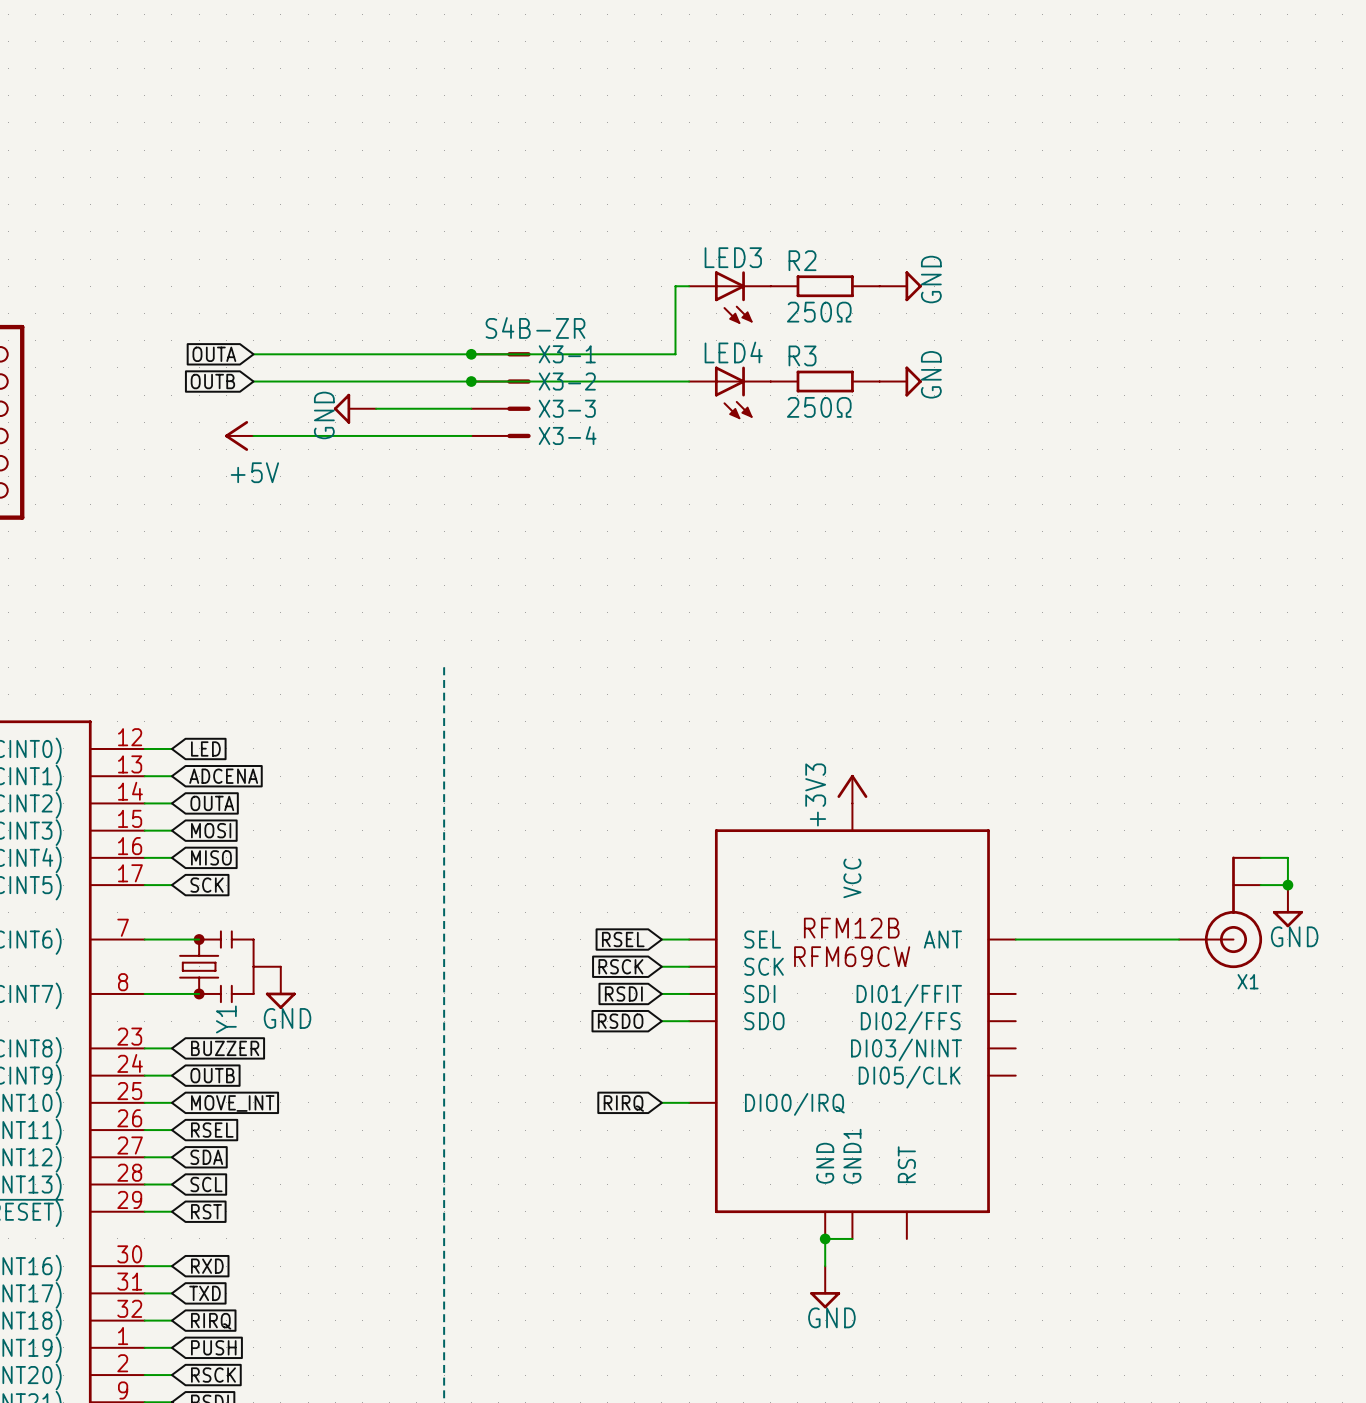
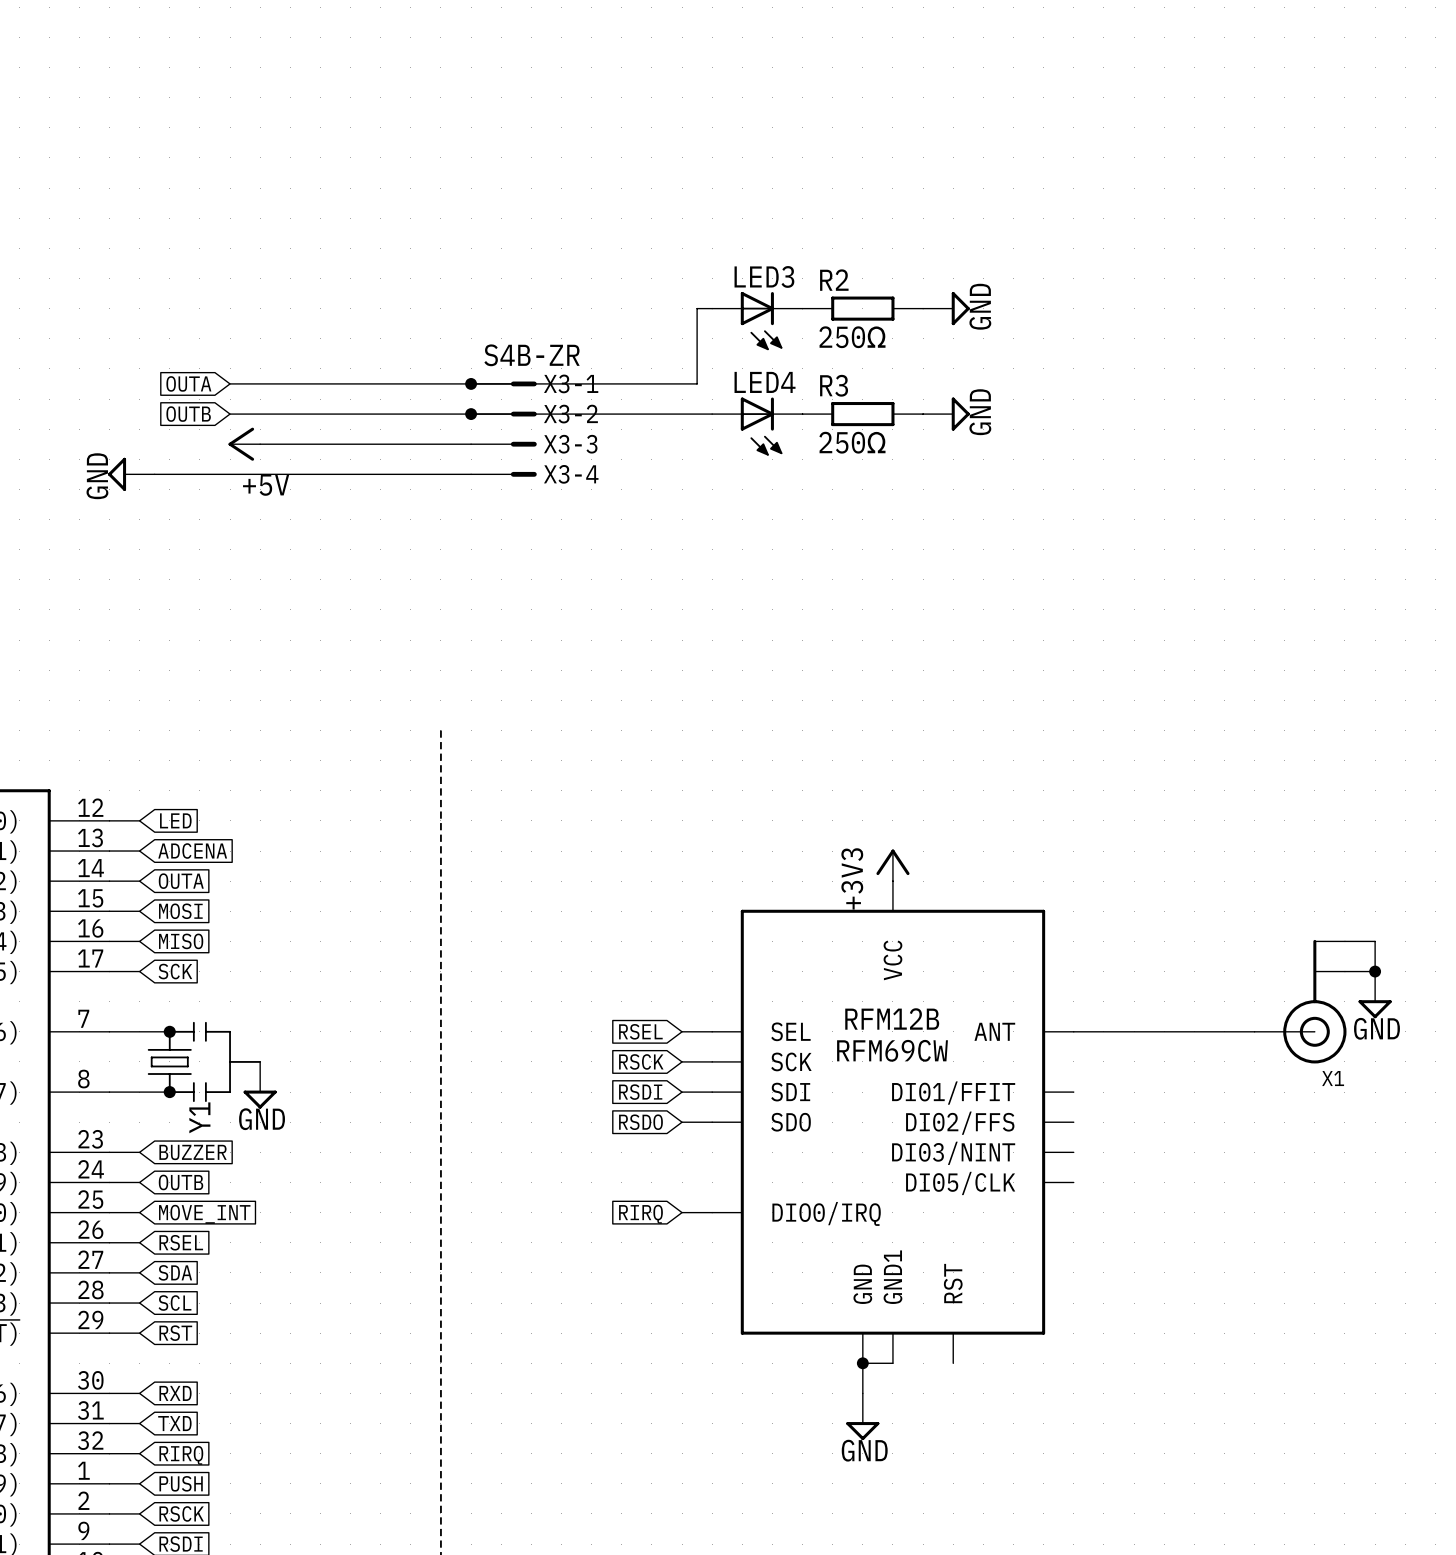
wire: none -> (260, 444) (365, 444)
power symbol position: GND (354, 408) -> GND (131, 474)
wire: none -> (154, 474) (230, 474)
power symbol position: +5V (239, 435) -> +5V (244, 444)

